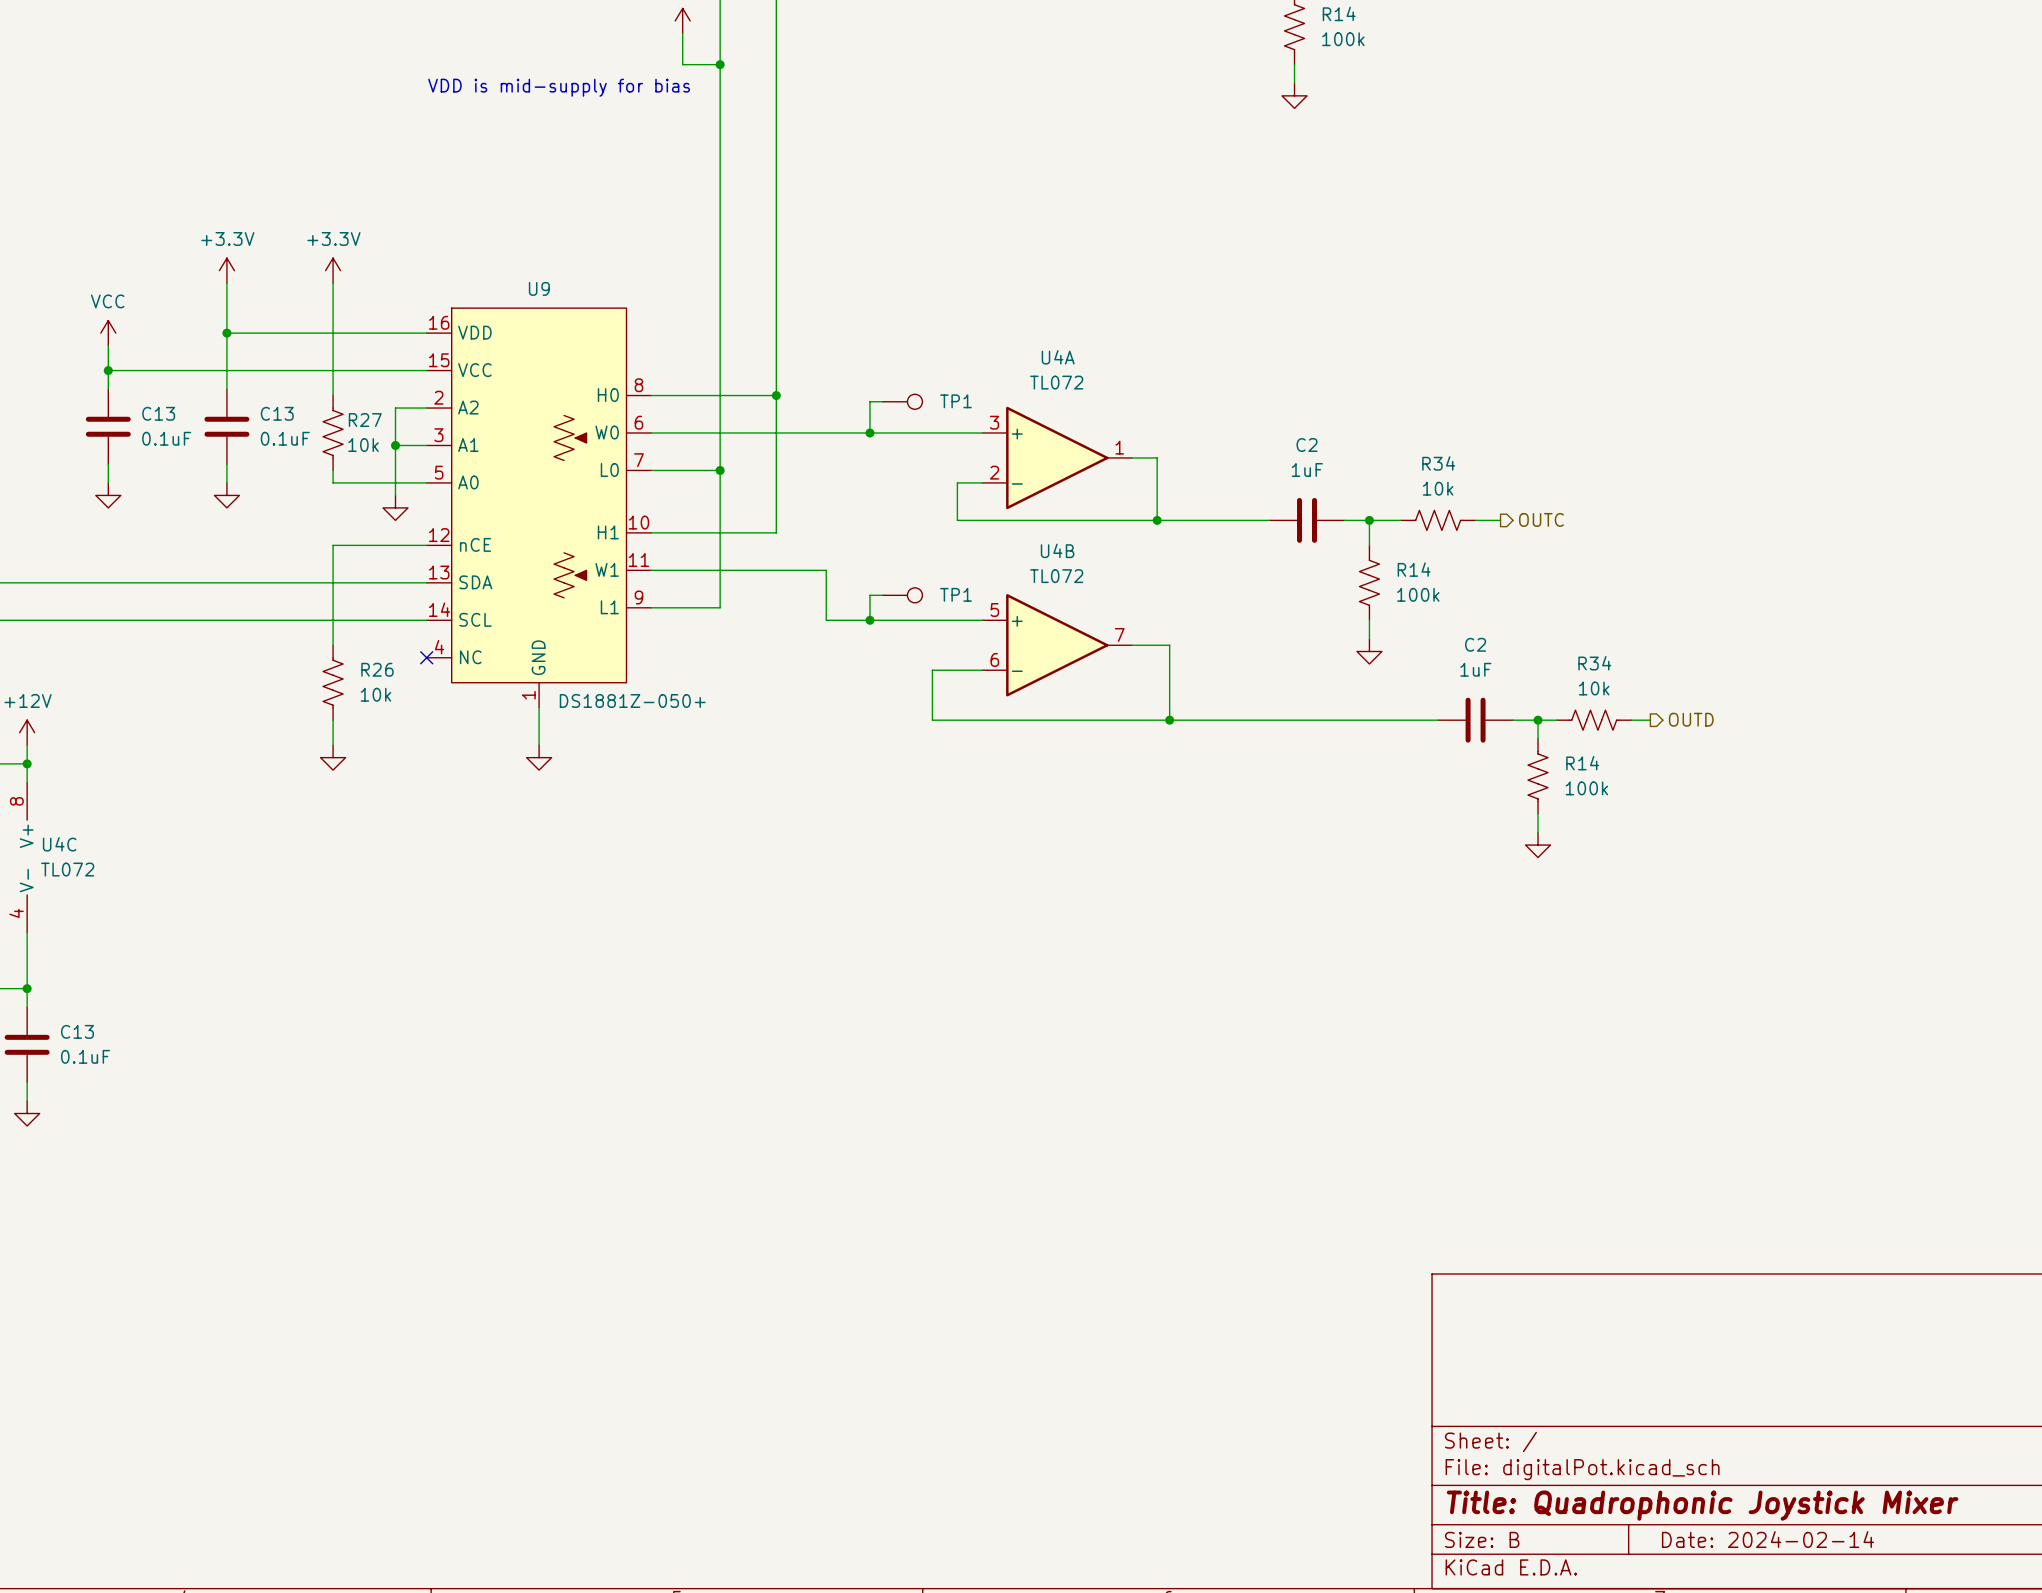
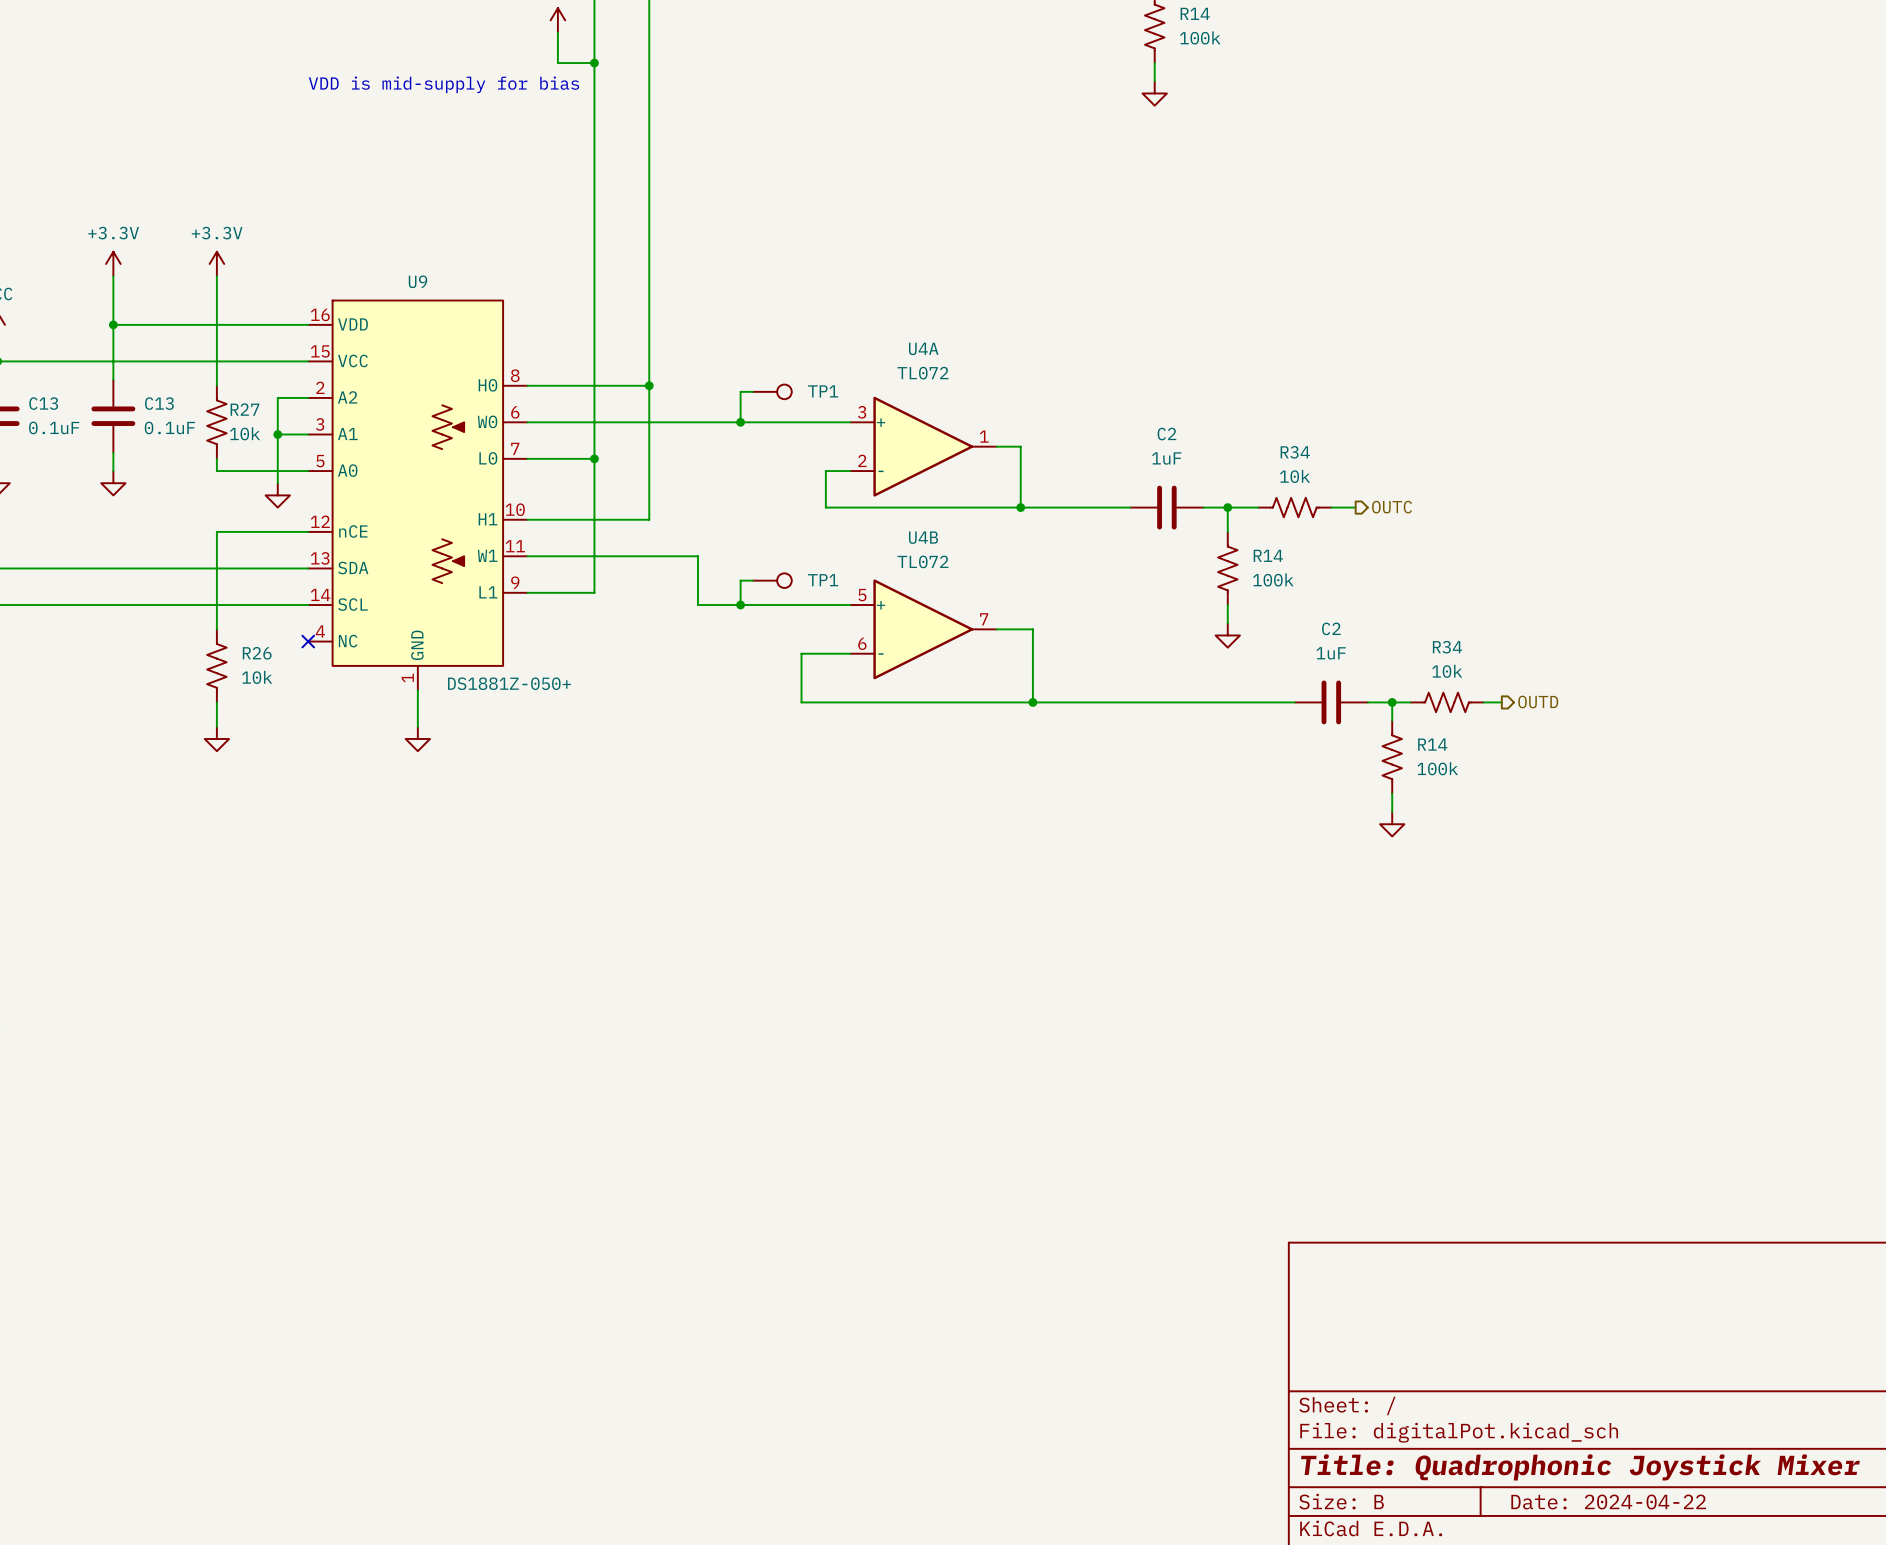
title block: Date: 2024-02-14 (1767, 1539) -> Date: 2024-04-22 (1608, 1502)

